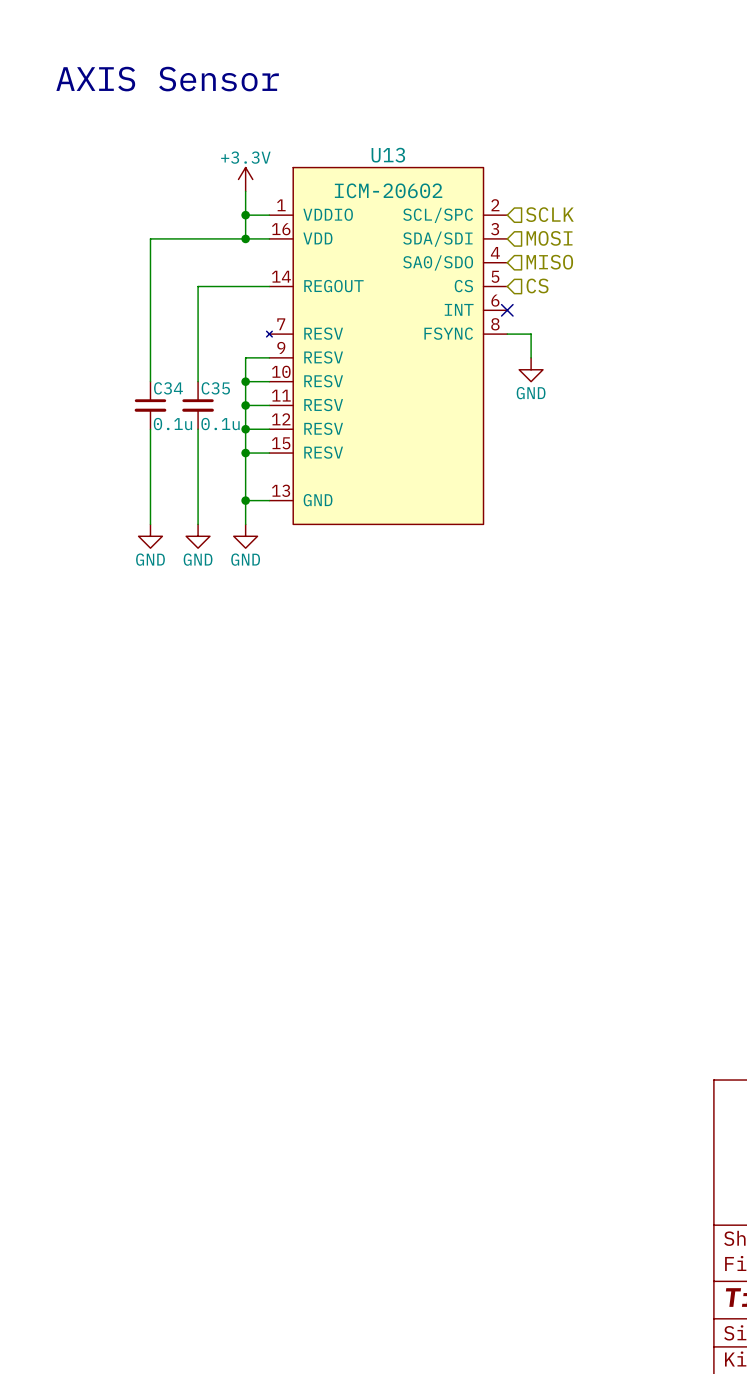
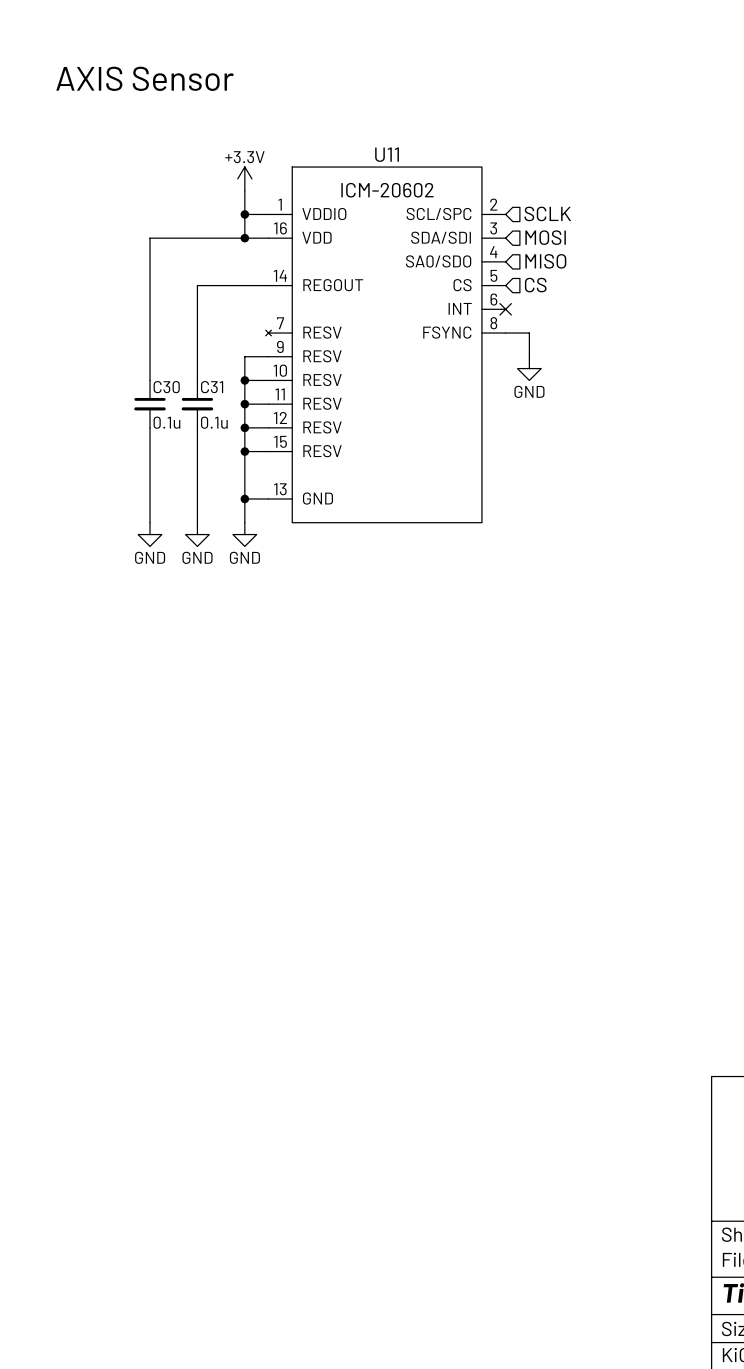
U13 name: U13 (388, 155) -> U11 (387, 154)
C34 name: C34 (168, 388) -> C30 (166, 387)
C35 name: C35 (215, 388) -> C31 (212, 387)

